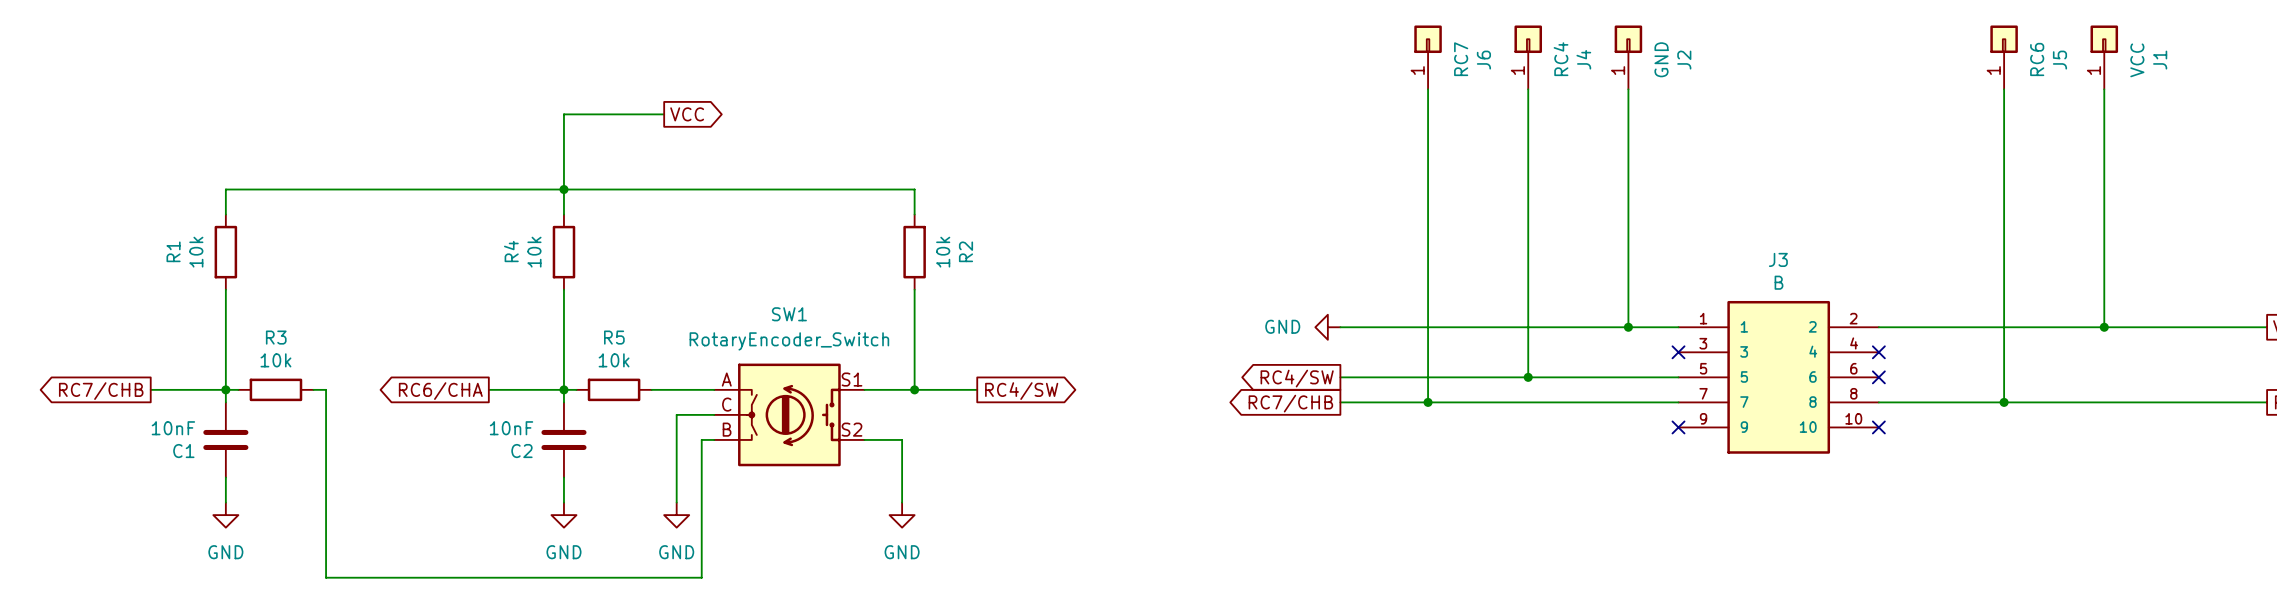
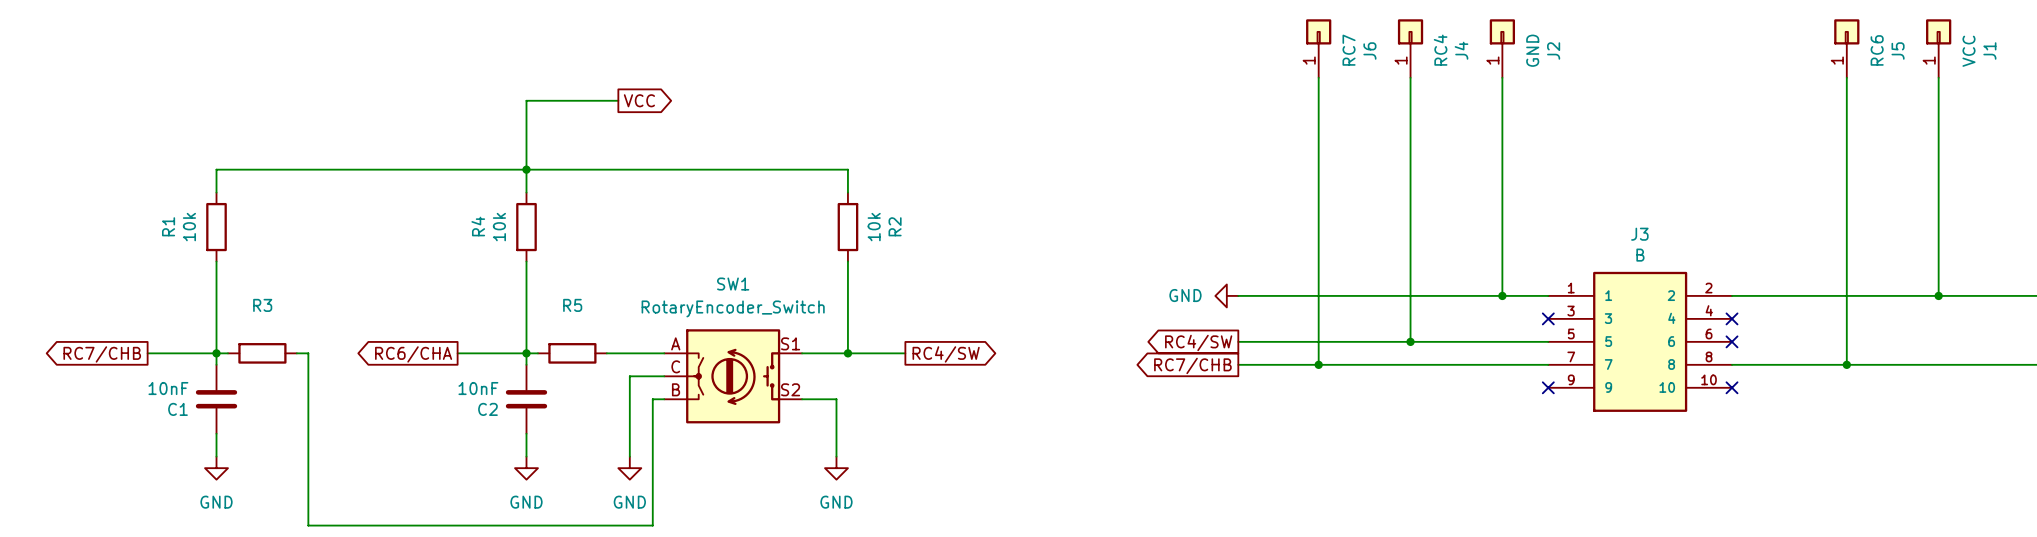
R3 value: 10k (275, 360) -> none
R5 value: 10k (614, 360) -> none

